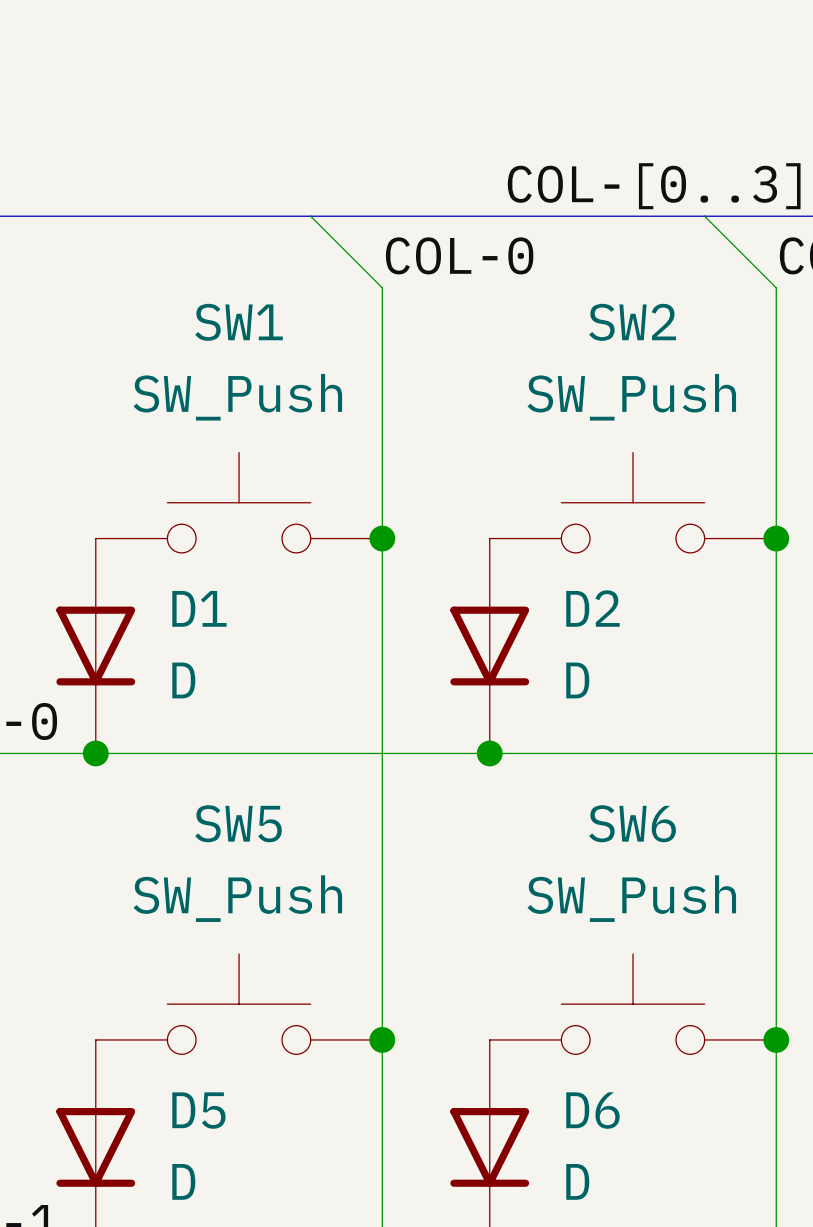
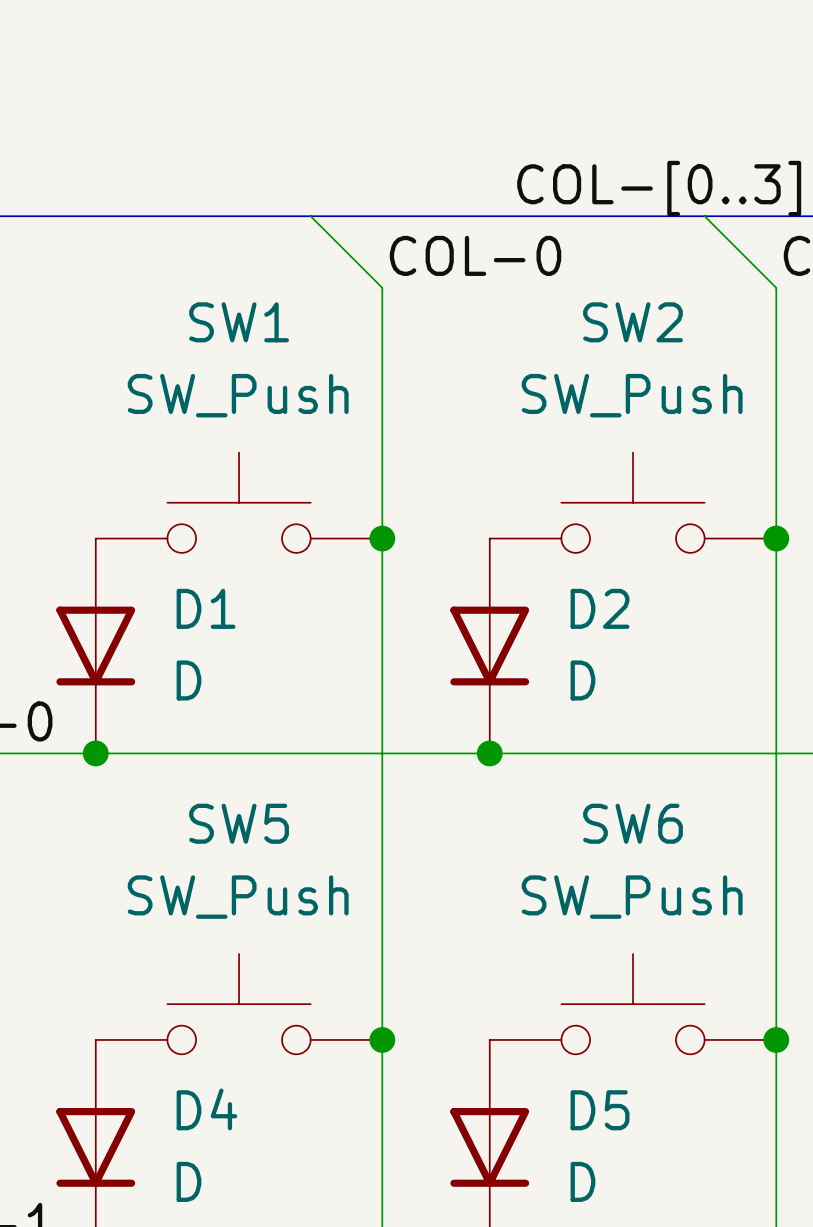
D5 name: D5 (198, 1110) -> D4 (206, 1109)
D6 name: D6 (592, 1110) -> D5 (600, 1110)

